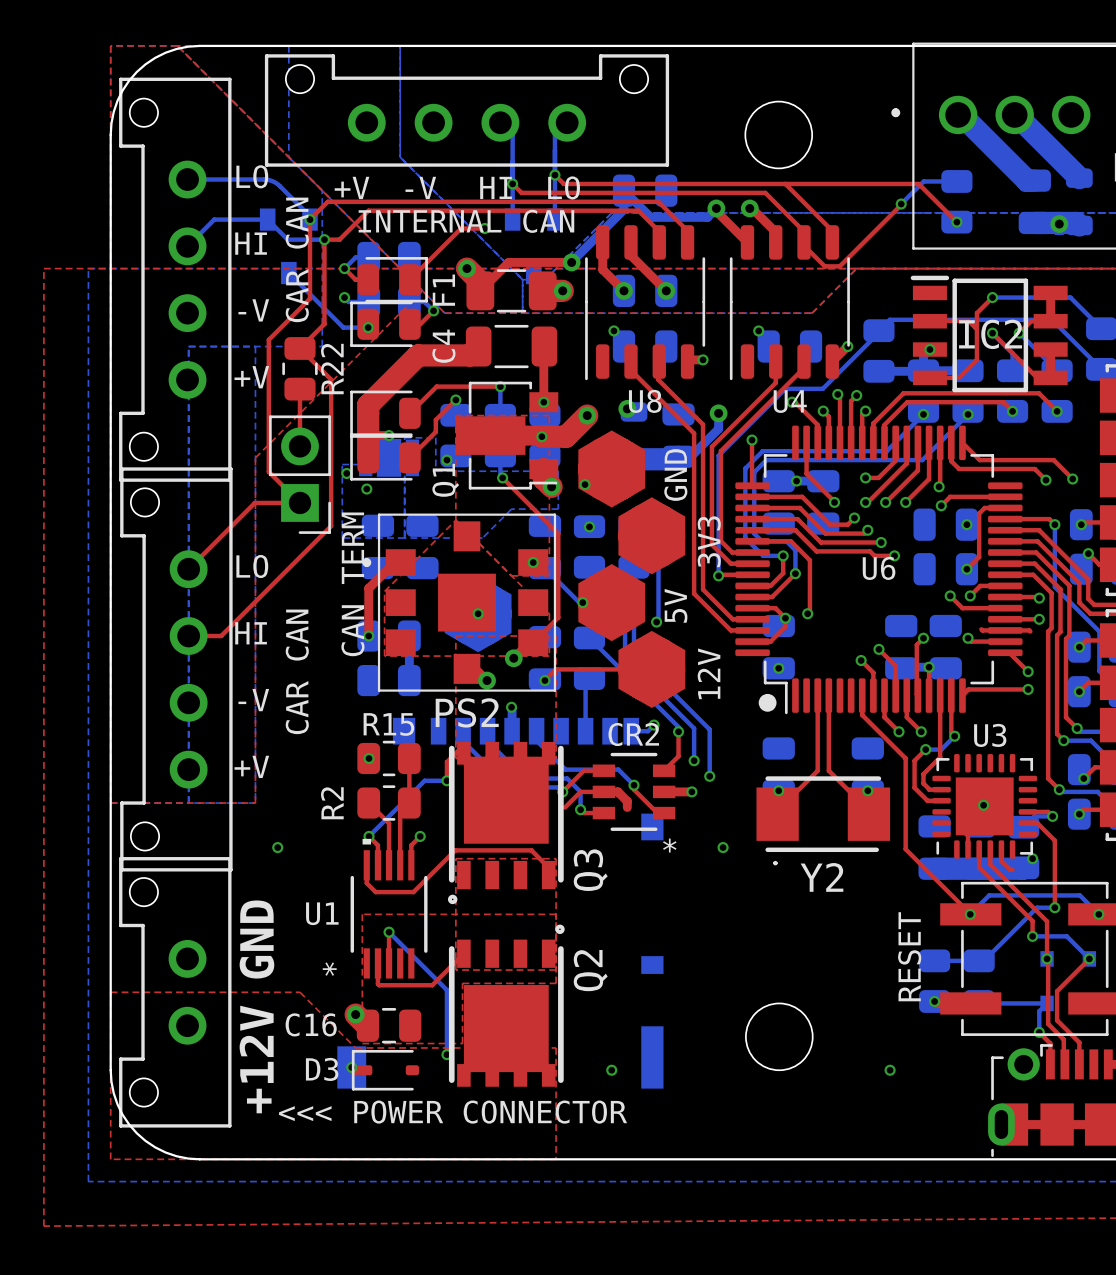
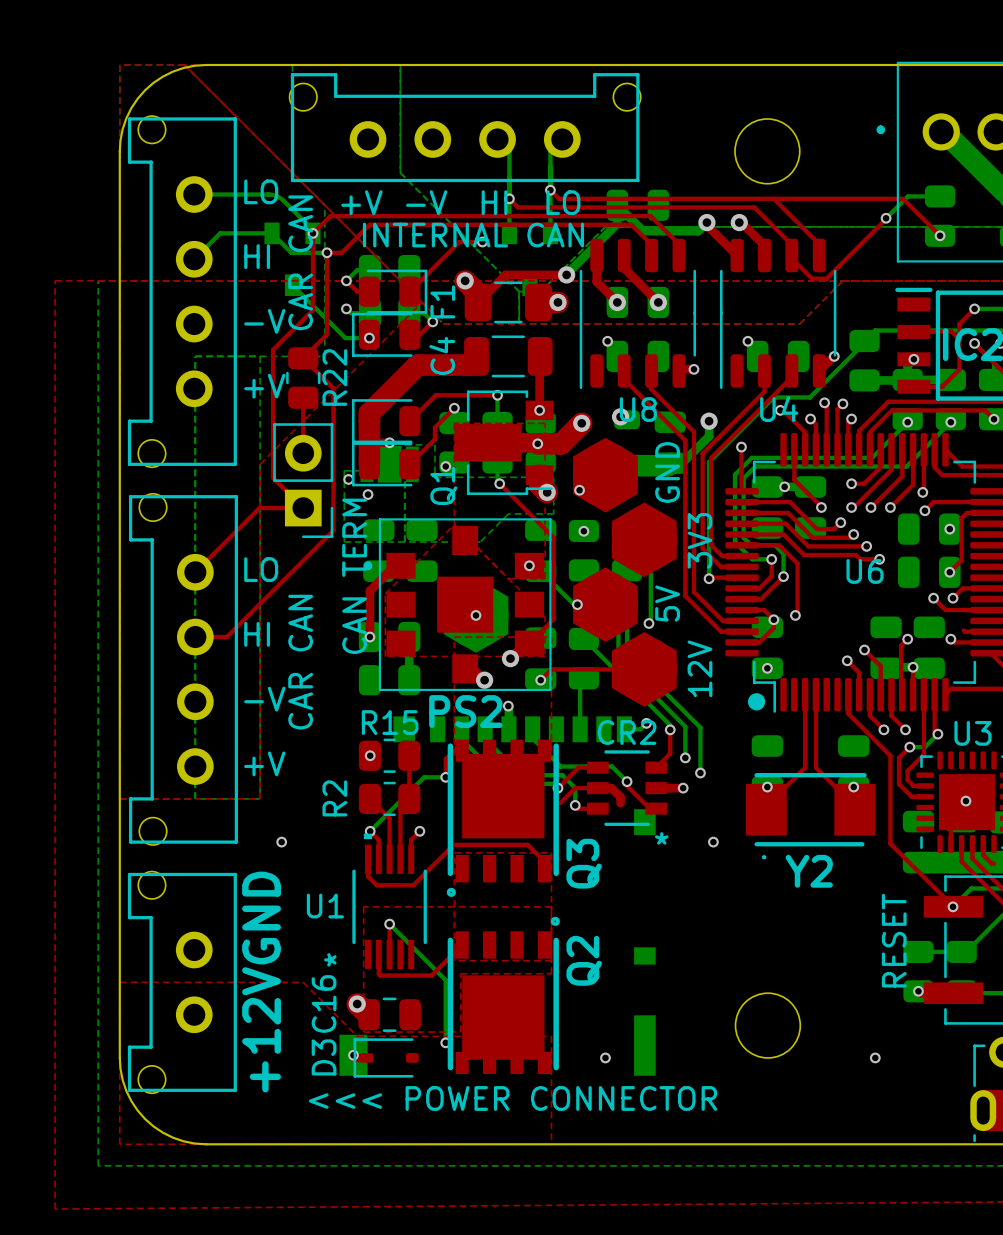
part footprint: [264, 54, 670, 167] -> [289, 73, 641, 183]
part footprint: [119, 77, 232, 482] -> [127, 116, 237, 468]
part footprint: [120, 467, 233, 872] -> [128, 493, 238, 846]
part footprint: [119, 857, 232, 1128] -> [127, 871, 237, 1094]
C16 name rotation: 0° (311, 1024) -> 90° counterclockwise (324, 1003)
D3 name rotation: 0° (322, 1069) -> 90° counterclockwise (324, 1057)
text position: <<< POWER CONNECTOR (453, 1112) -> <<< POWER CONNECTOR (513, 1098)

